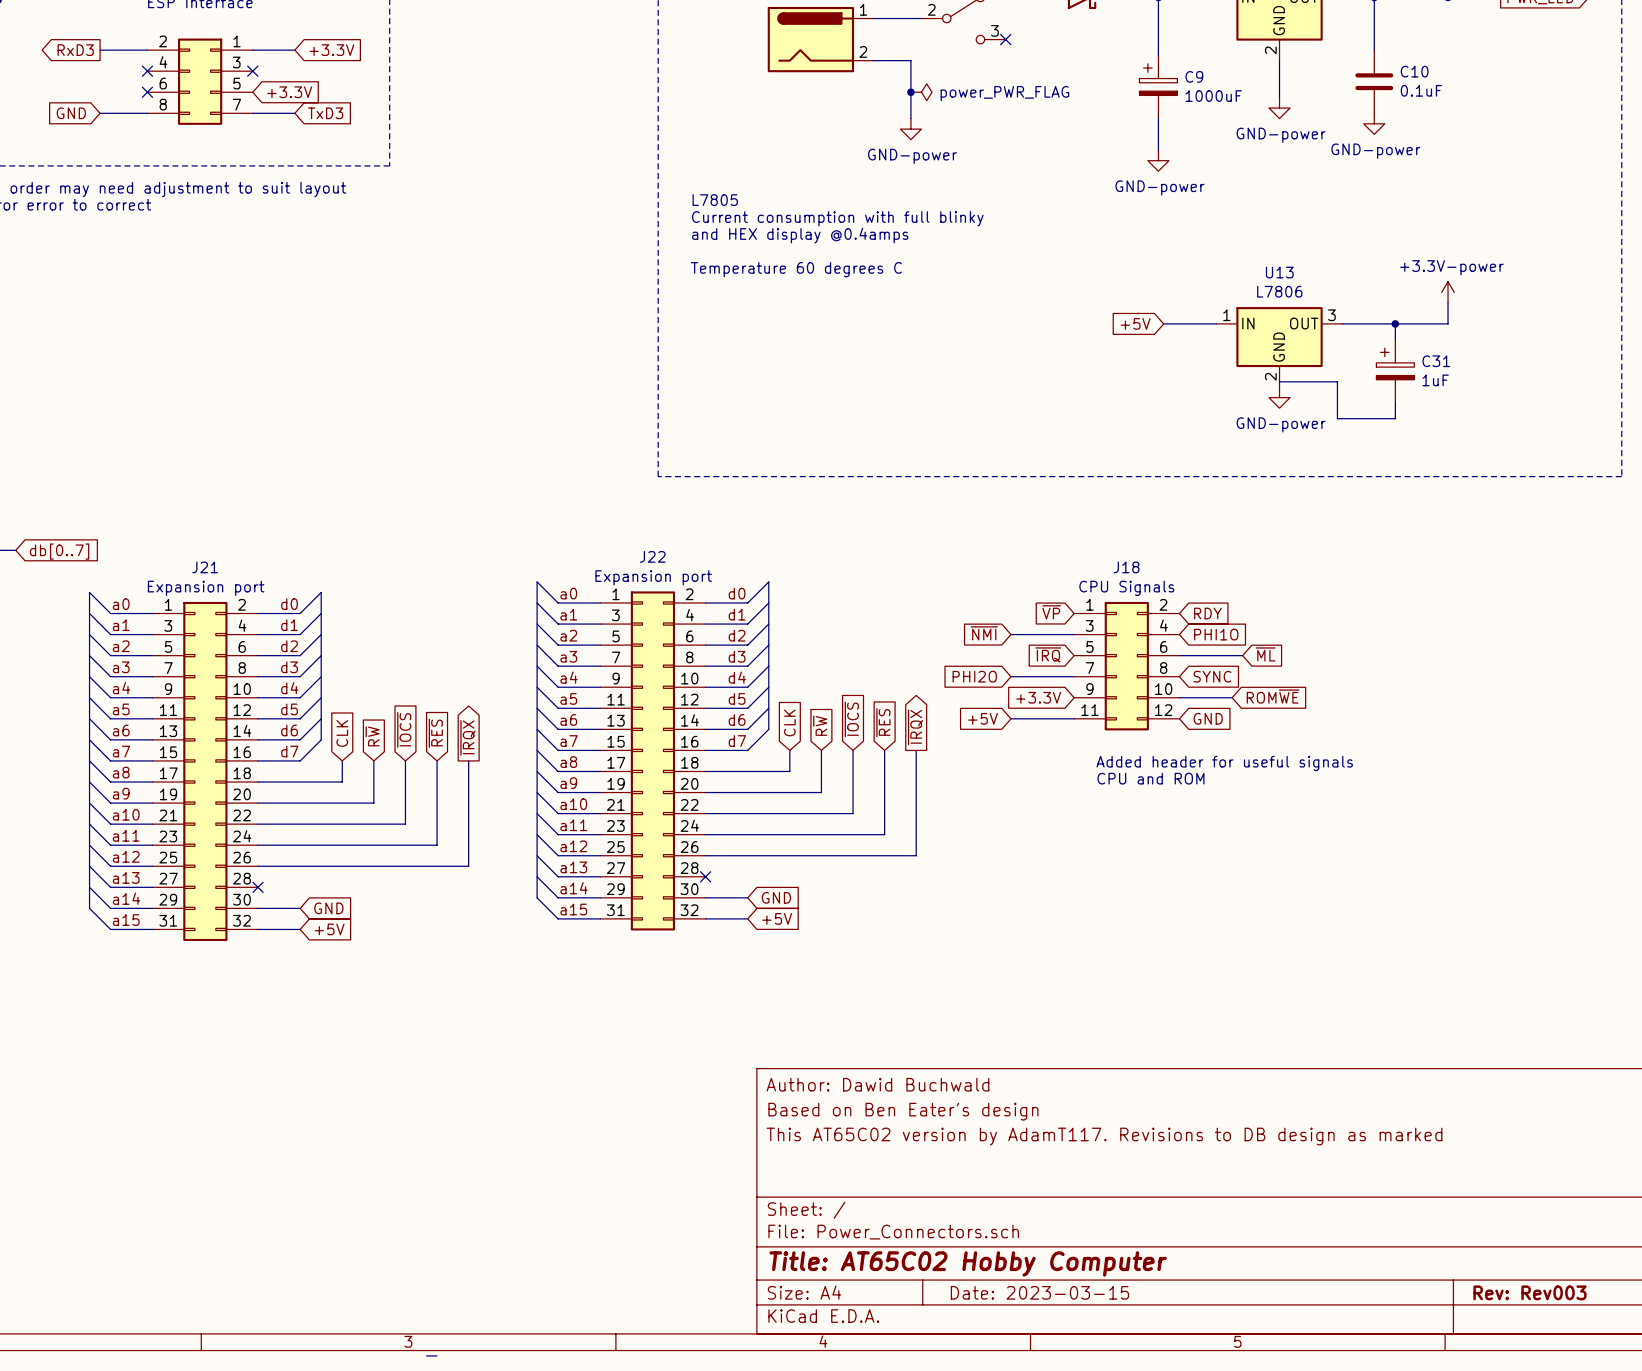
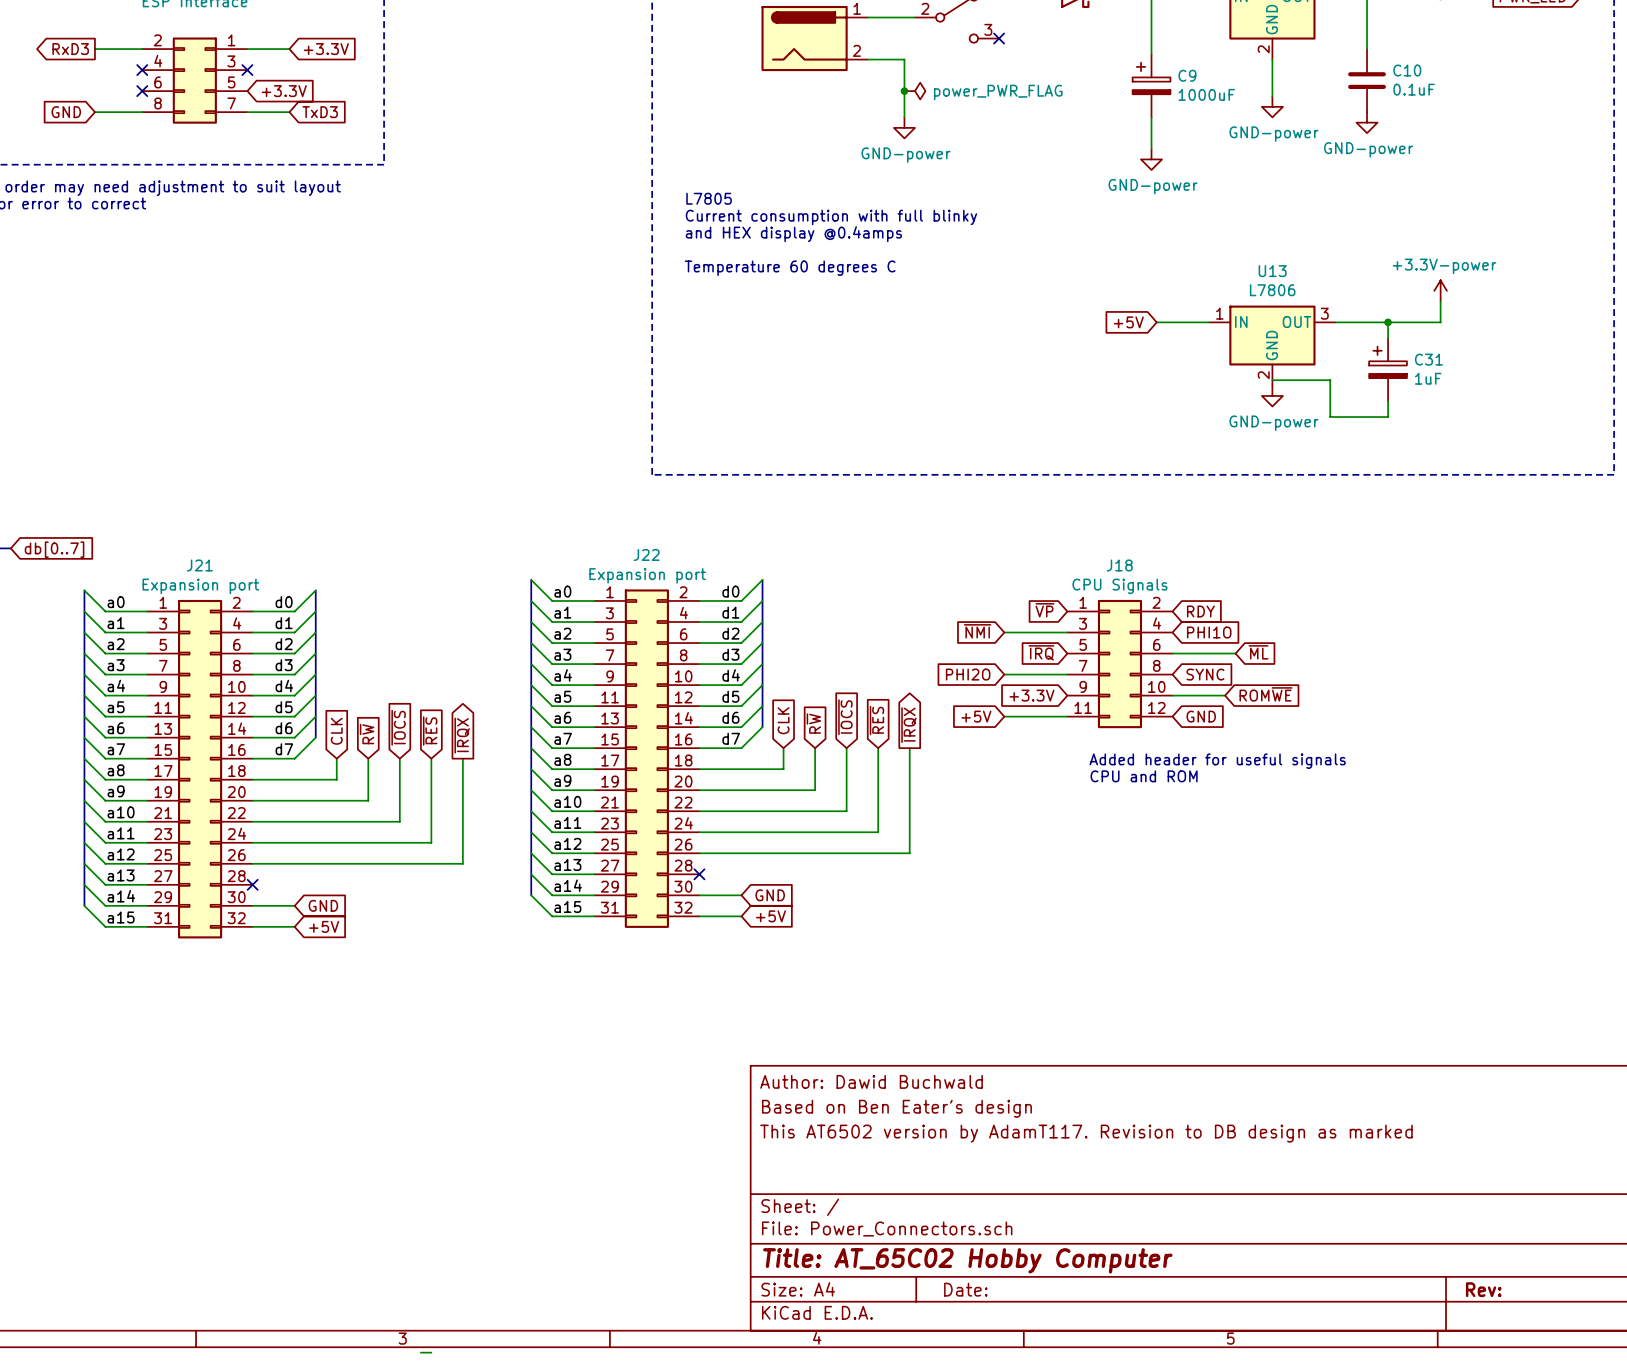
title block: This AT65C02 version by AdamT117. Revisions to DB design as marked (1104, 1136) -> This AT6502 version by AdamT117. Revision to DB design as marked (1086, 1133)
title block: Title: AT65C02 Hobby Computer (968, 1263) -> Title: AT_65C02 Hobby Computer (967, 1260)
title block: Date: 2023-03-15 (1039, 1292) -> Date: (965, 1289)
title block: Rev: Rev003 (1529, 1292) -> Rev: (1483, 1289)

